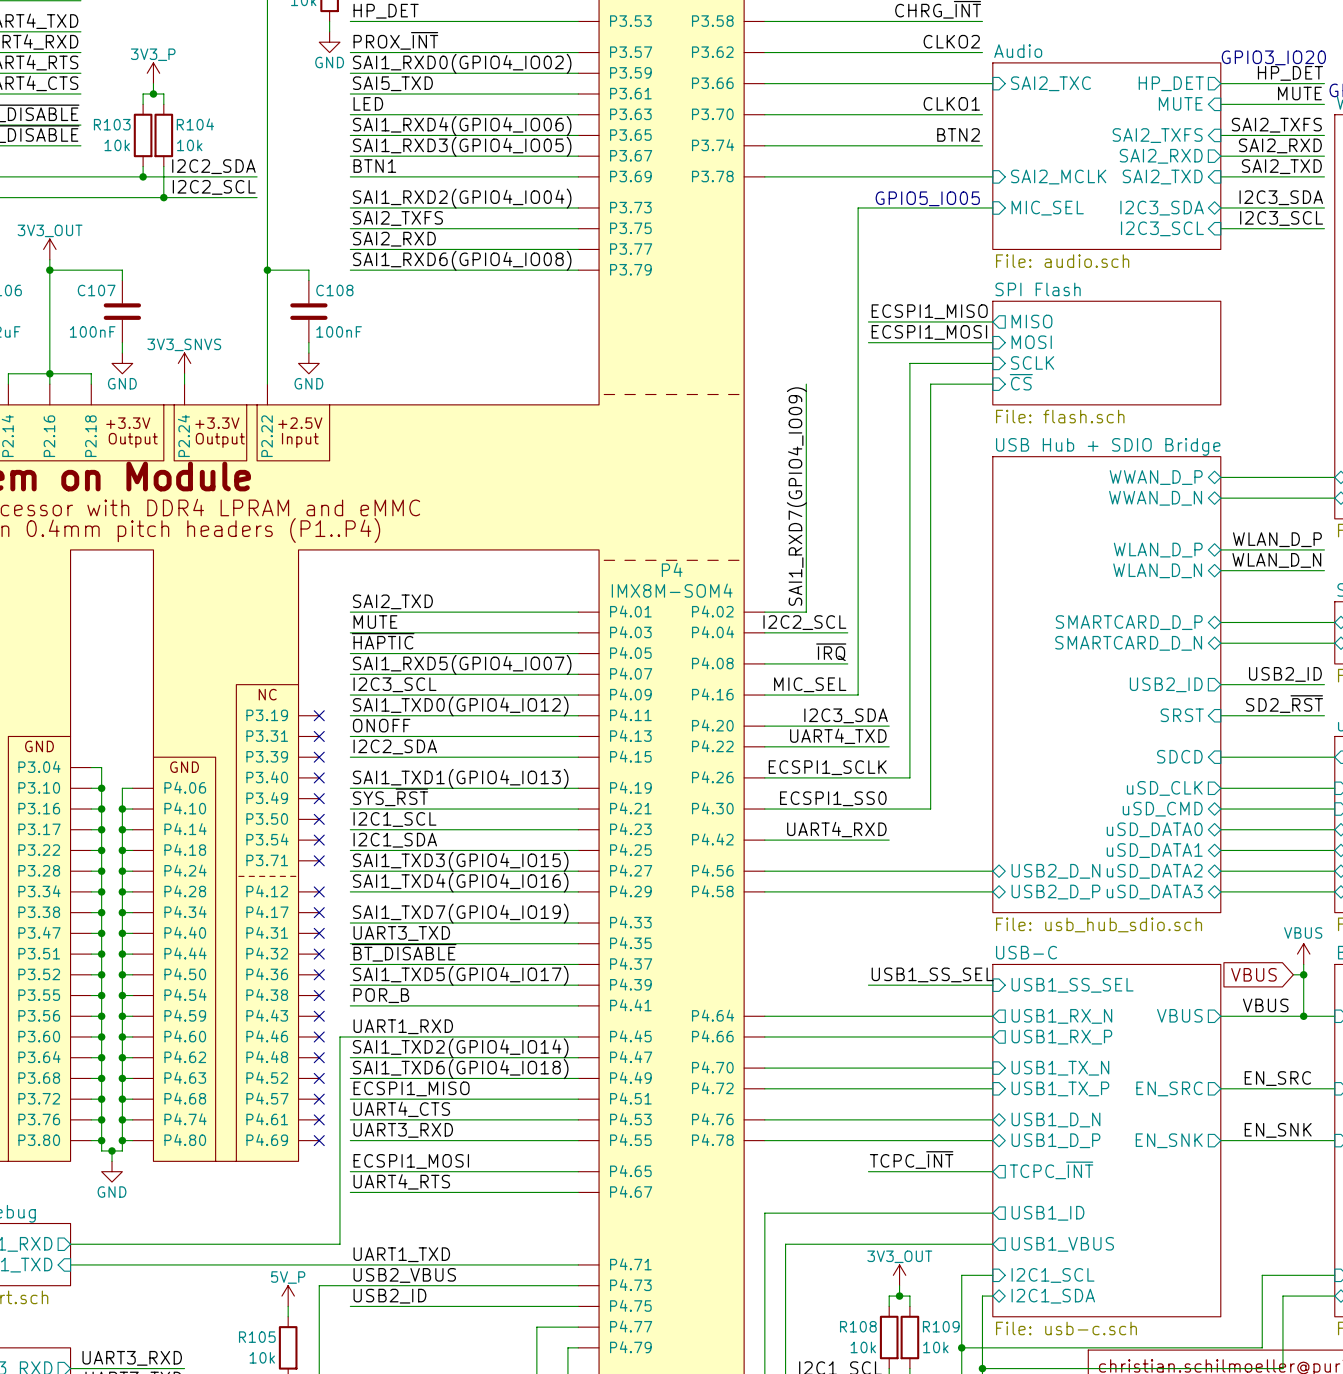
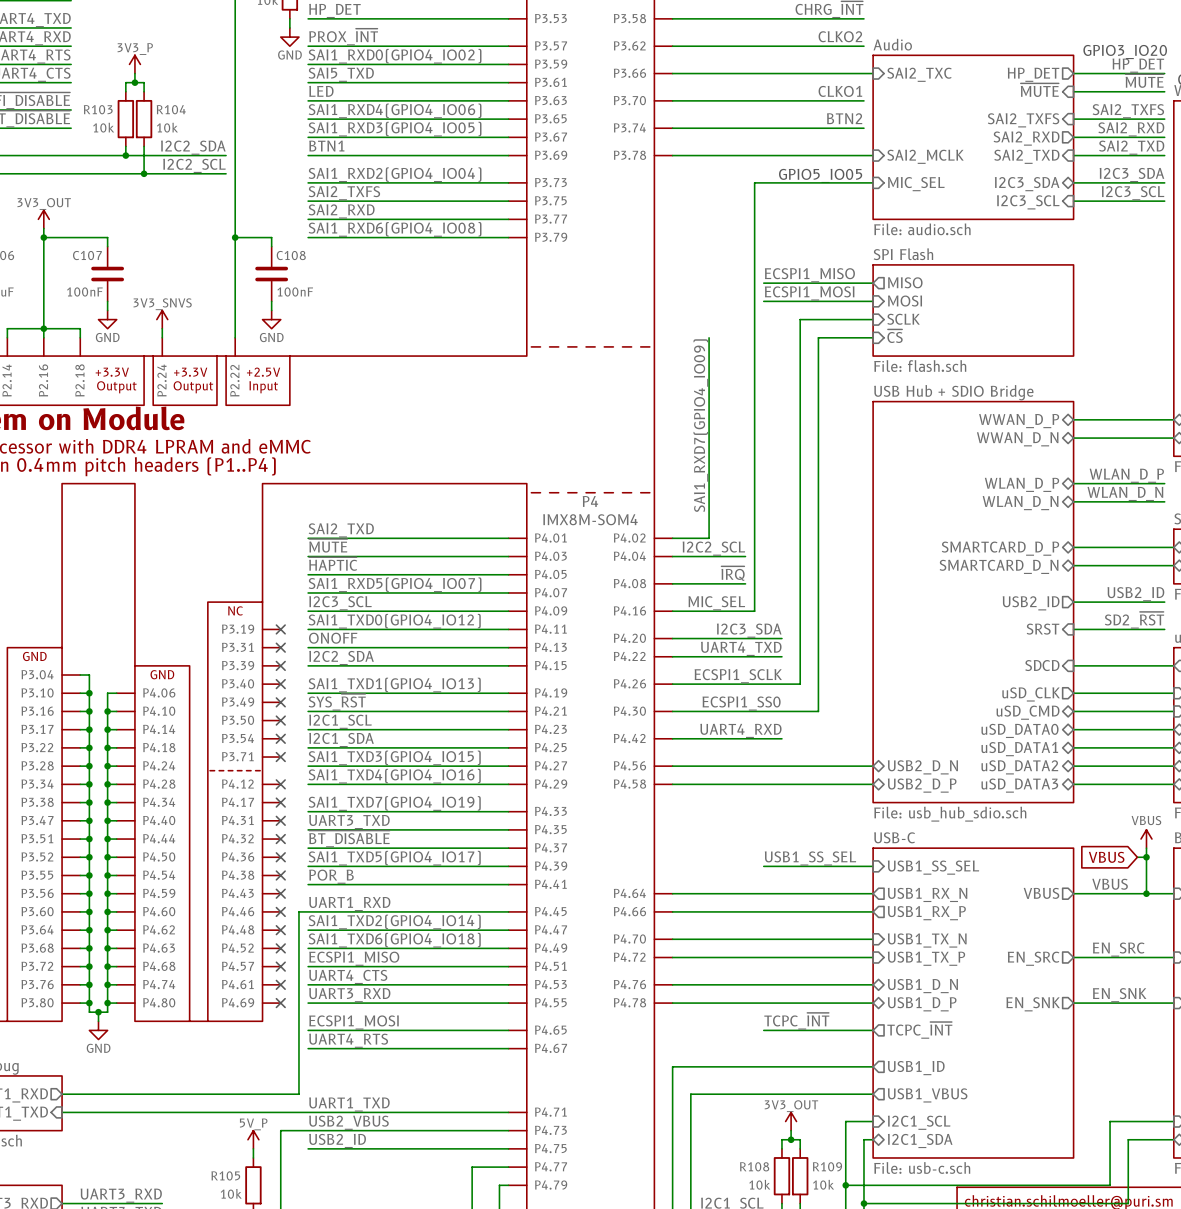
label: MUTE (1299, 93) -> ~{MUTE} (1144, 81)
sheet pin: MUTE (1180, 103) -> ~{MUTE} (1039, 90)
label: MUTE (375, 622) -> ~{MUTE} (328, 545)

